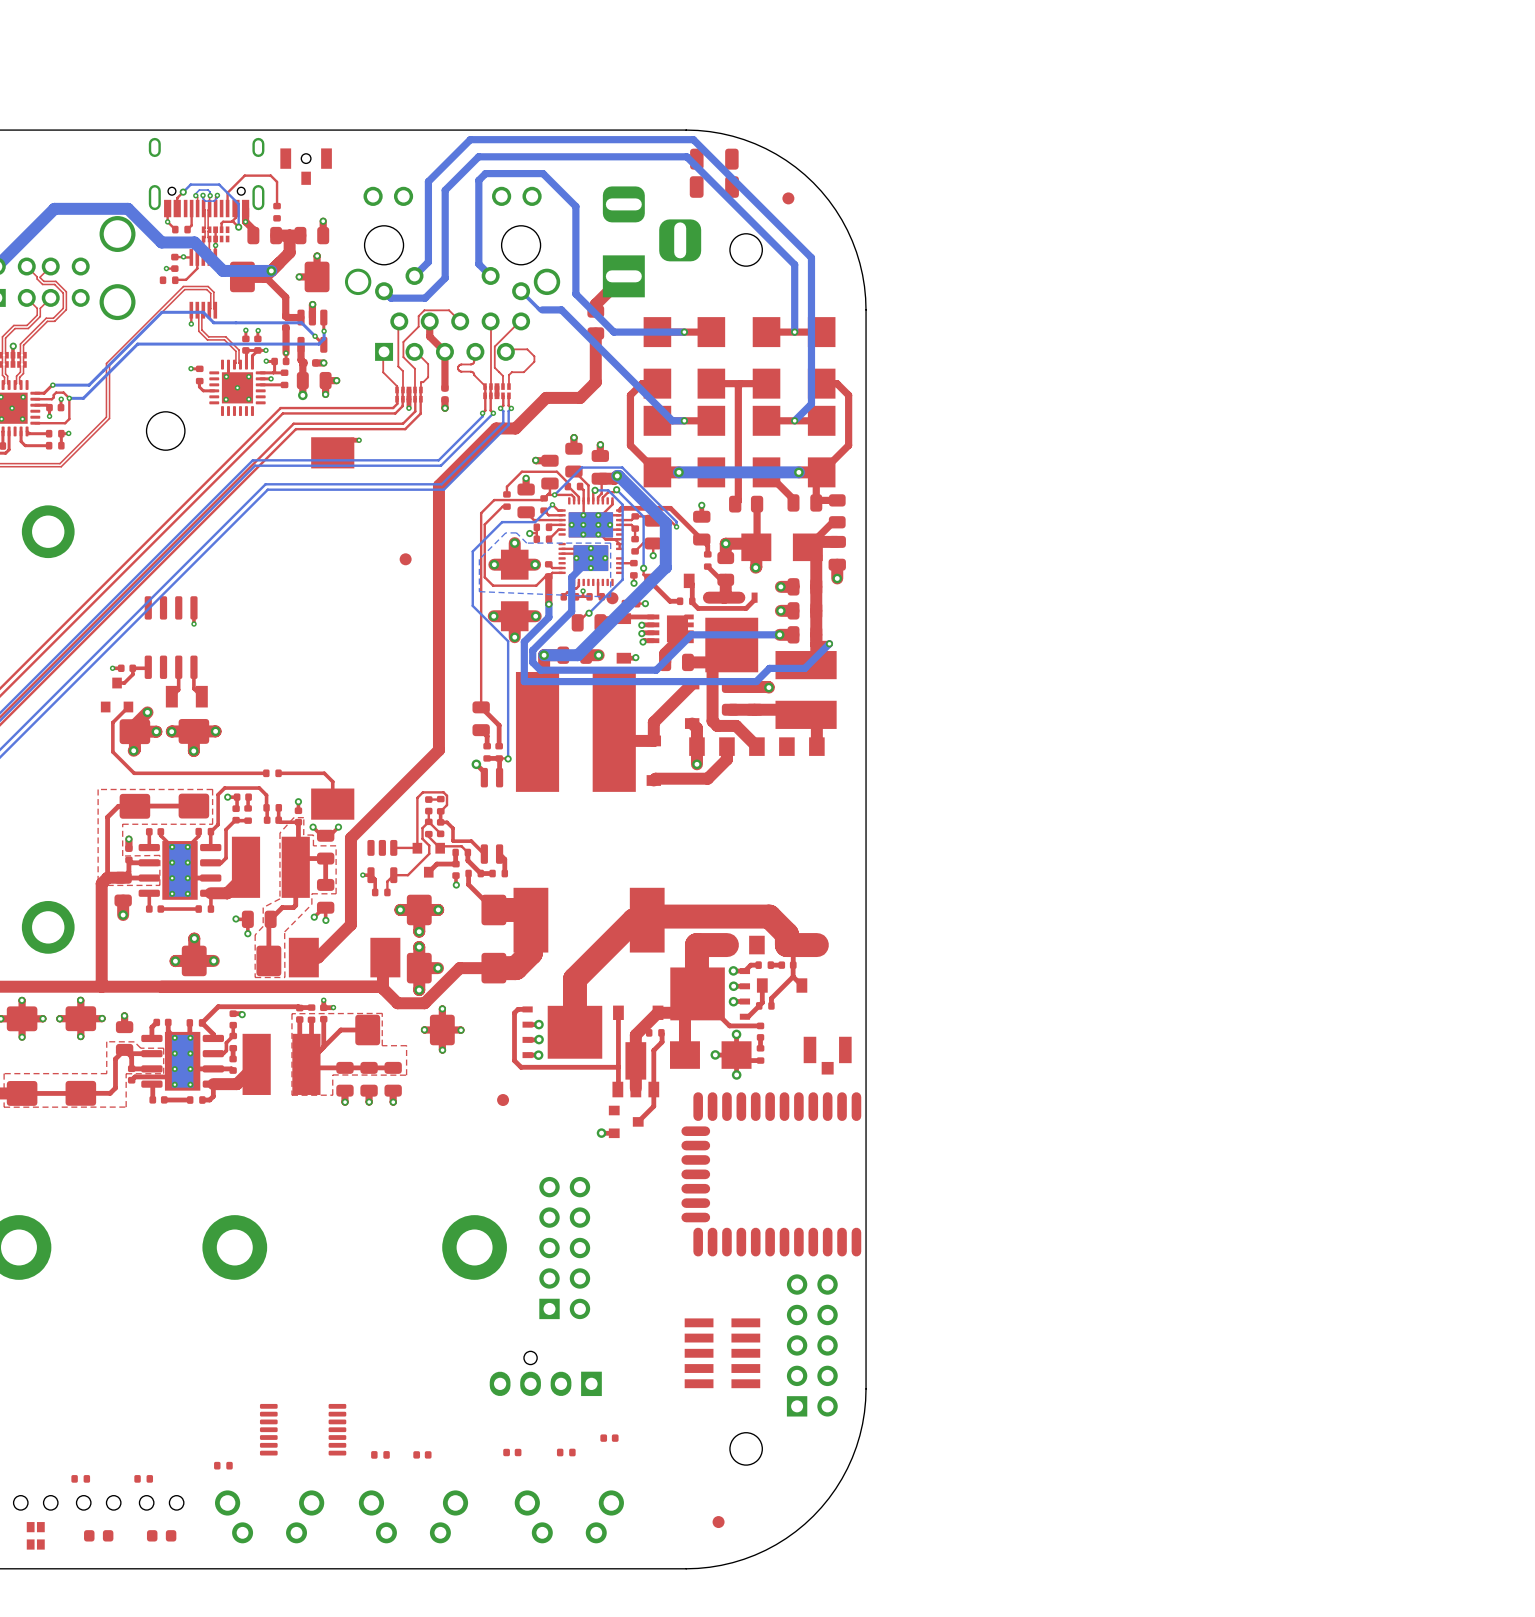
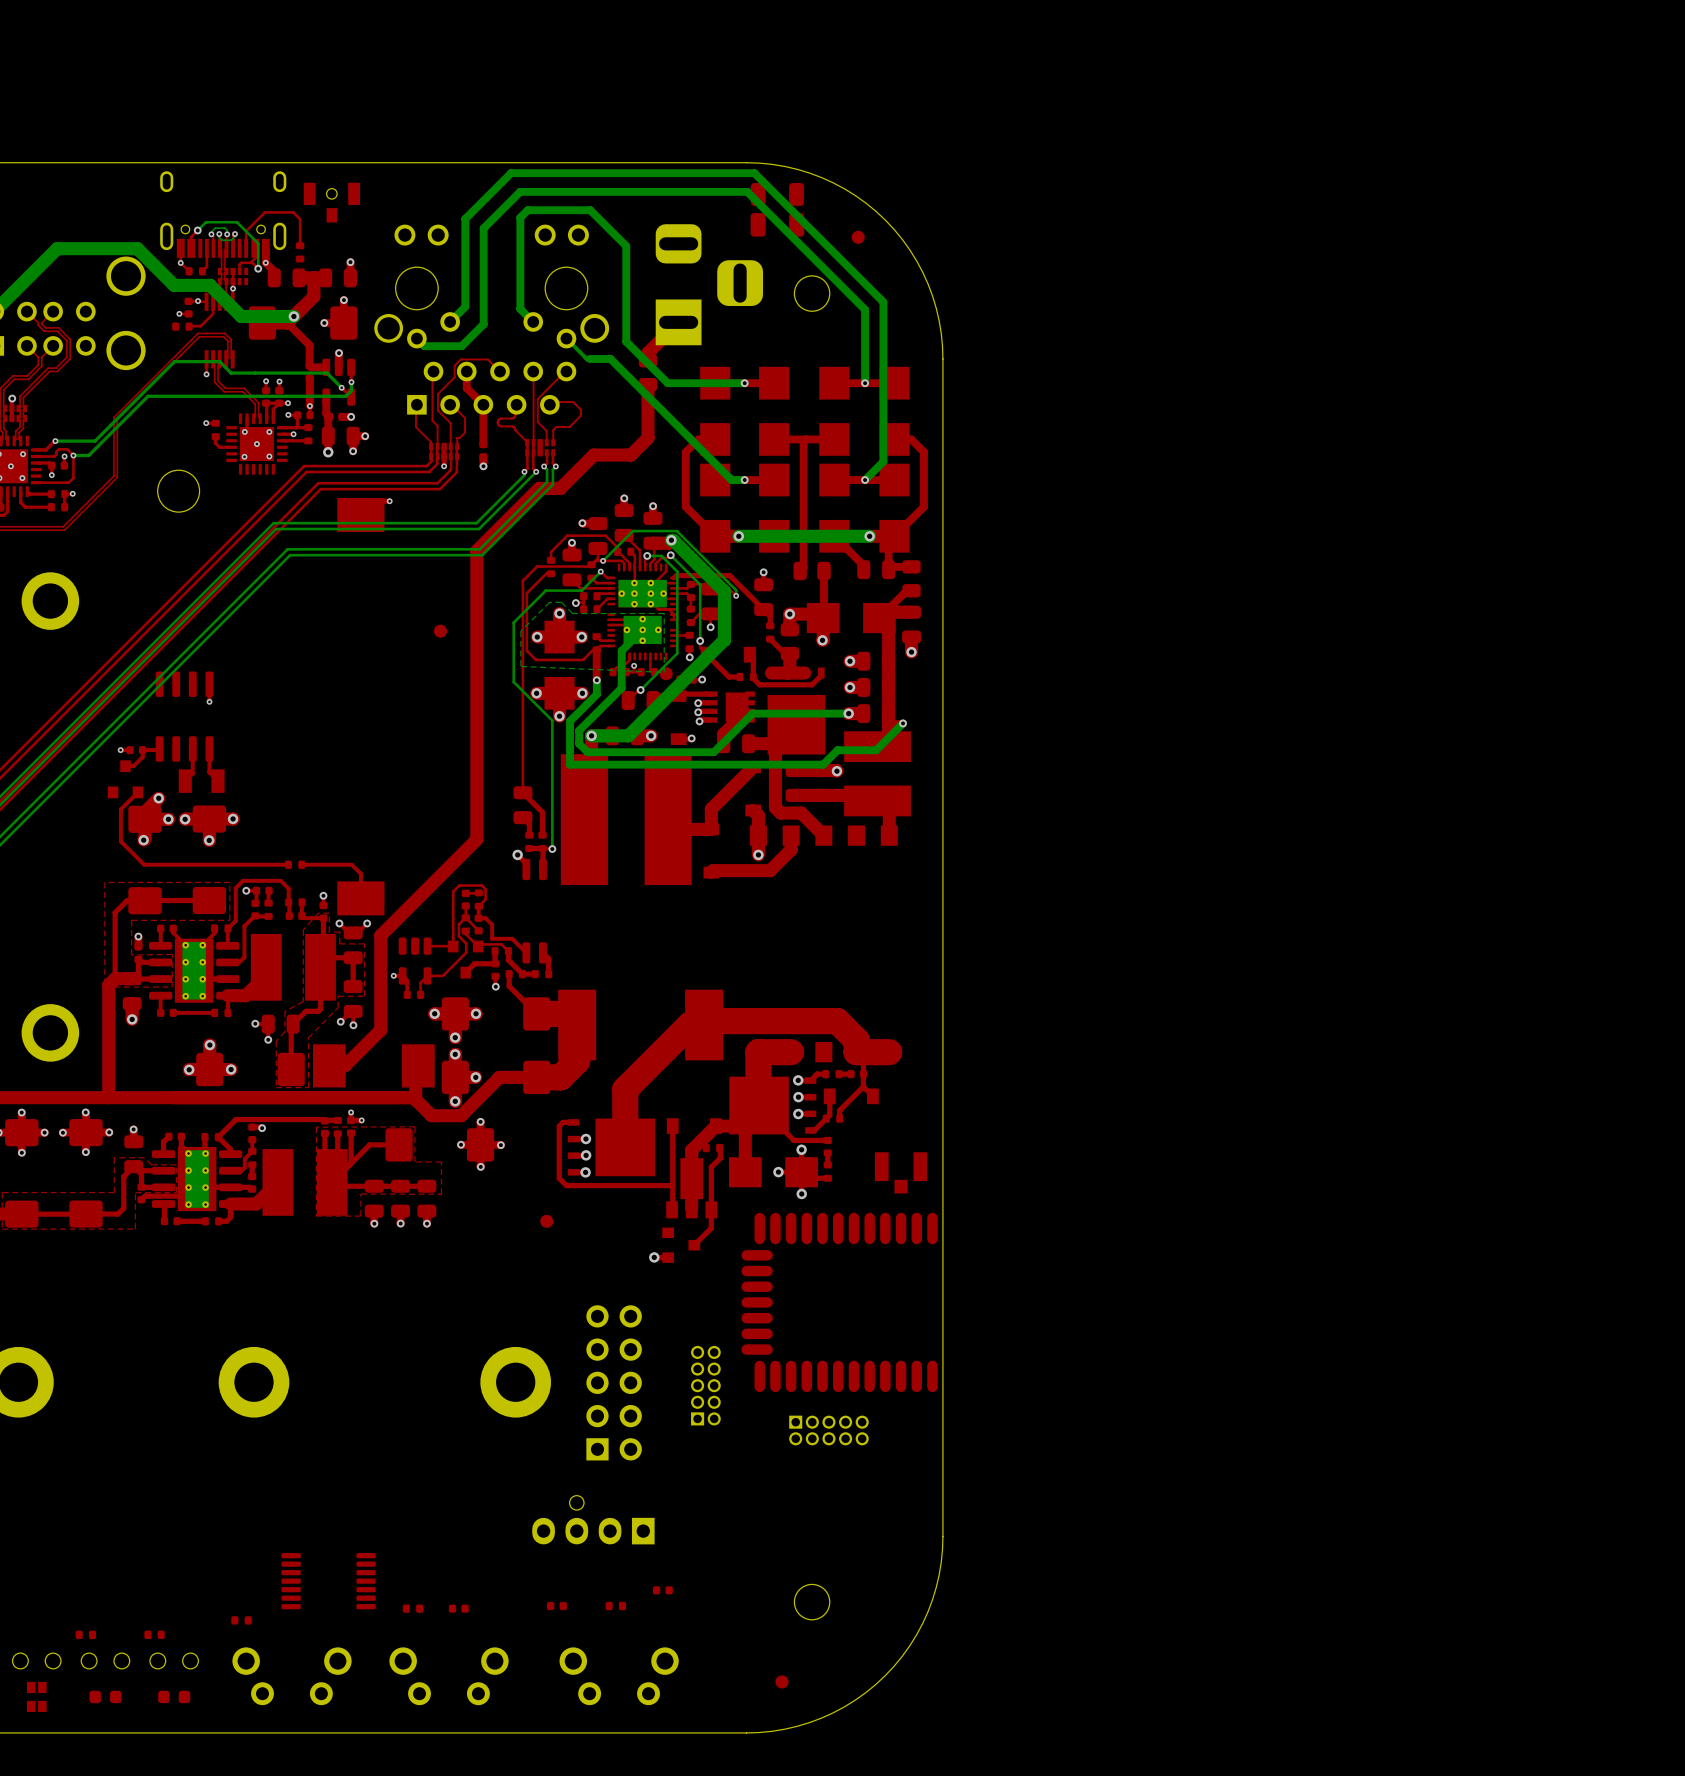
part: none -> (705, 1385)
part: none -> (828, 1430)
part: (812, 1345) -> none
part: (722, 1353) -> none

